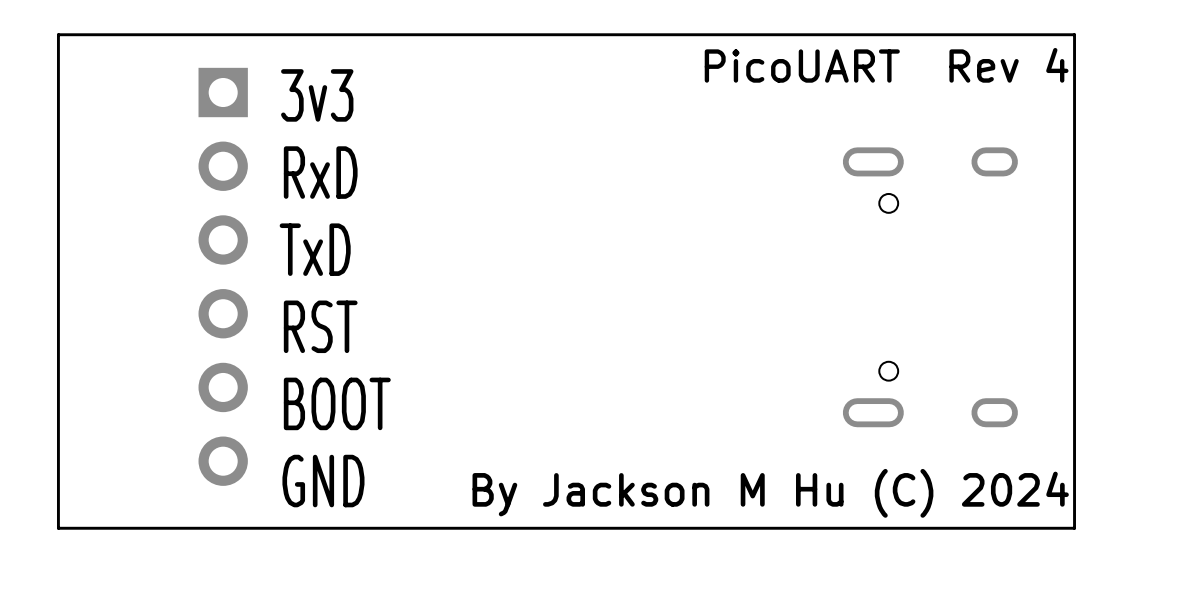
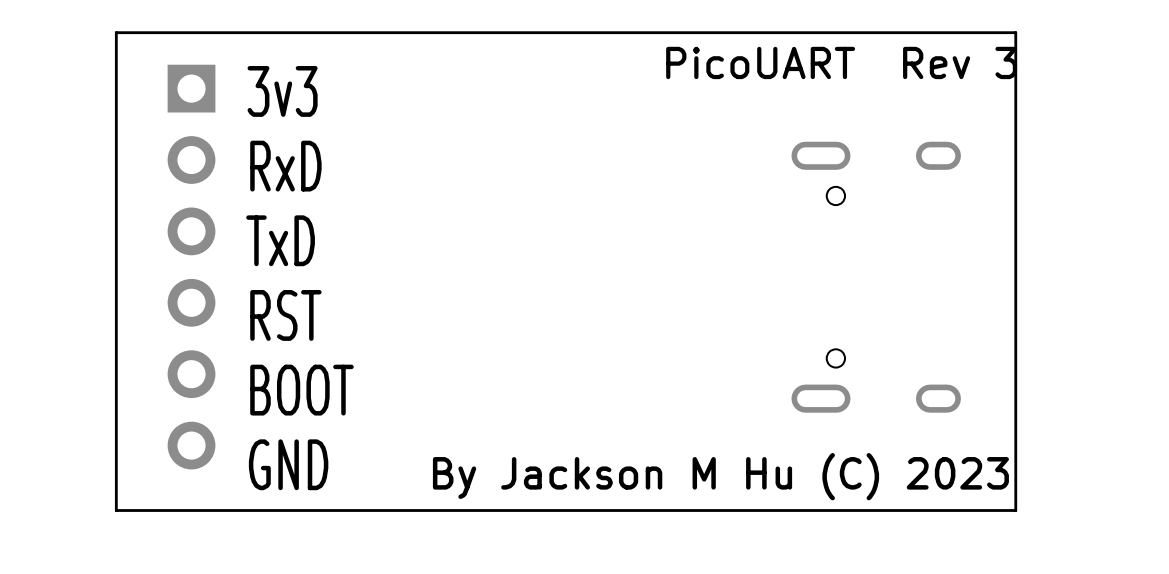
board edge: (145, 34) (58, 34) (58, 528) (145, 528) -> (116, 32) (116, 510)
text: PicoUART Rev 4 (886, 65) -> PicoUART Rev 3 (841, 62)
text: By Jackson M Hu (C) 2024 (770, 493) -> By Jackson M Hu (C) 2023 (720, 476)

